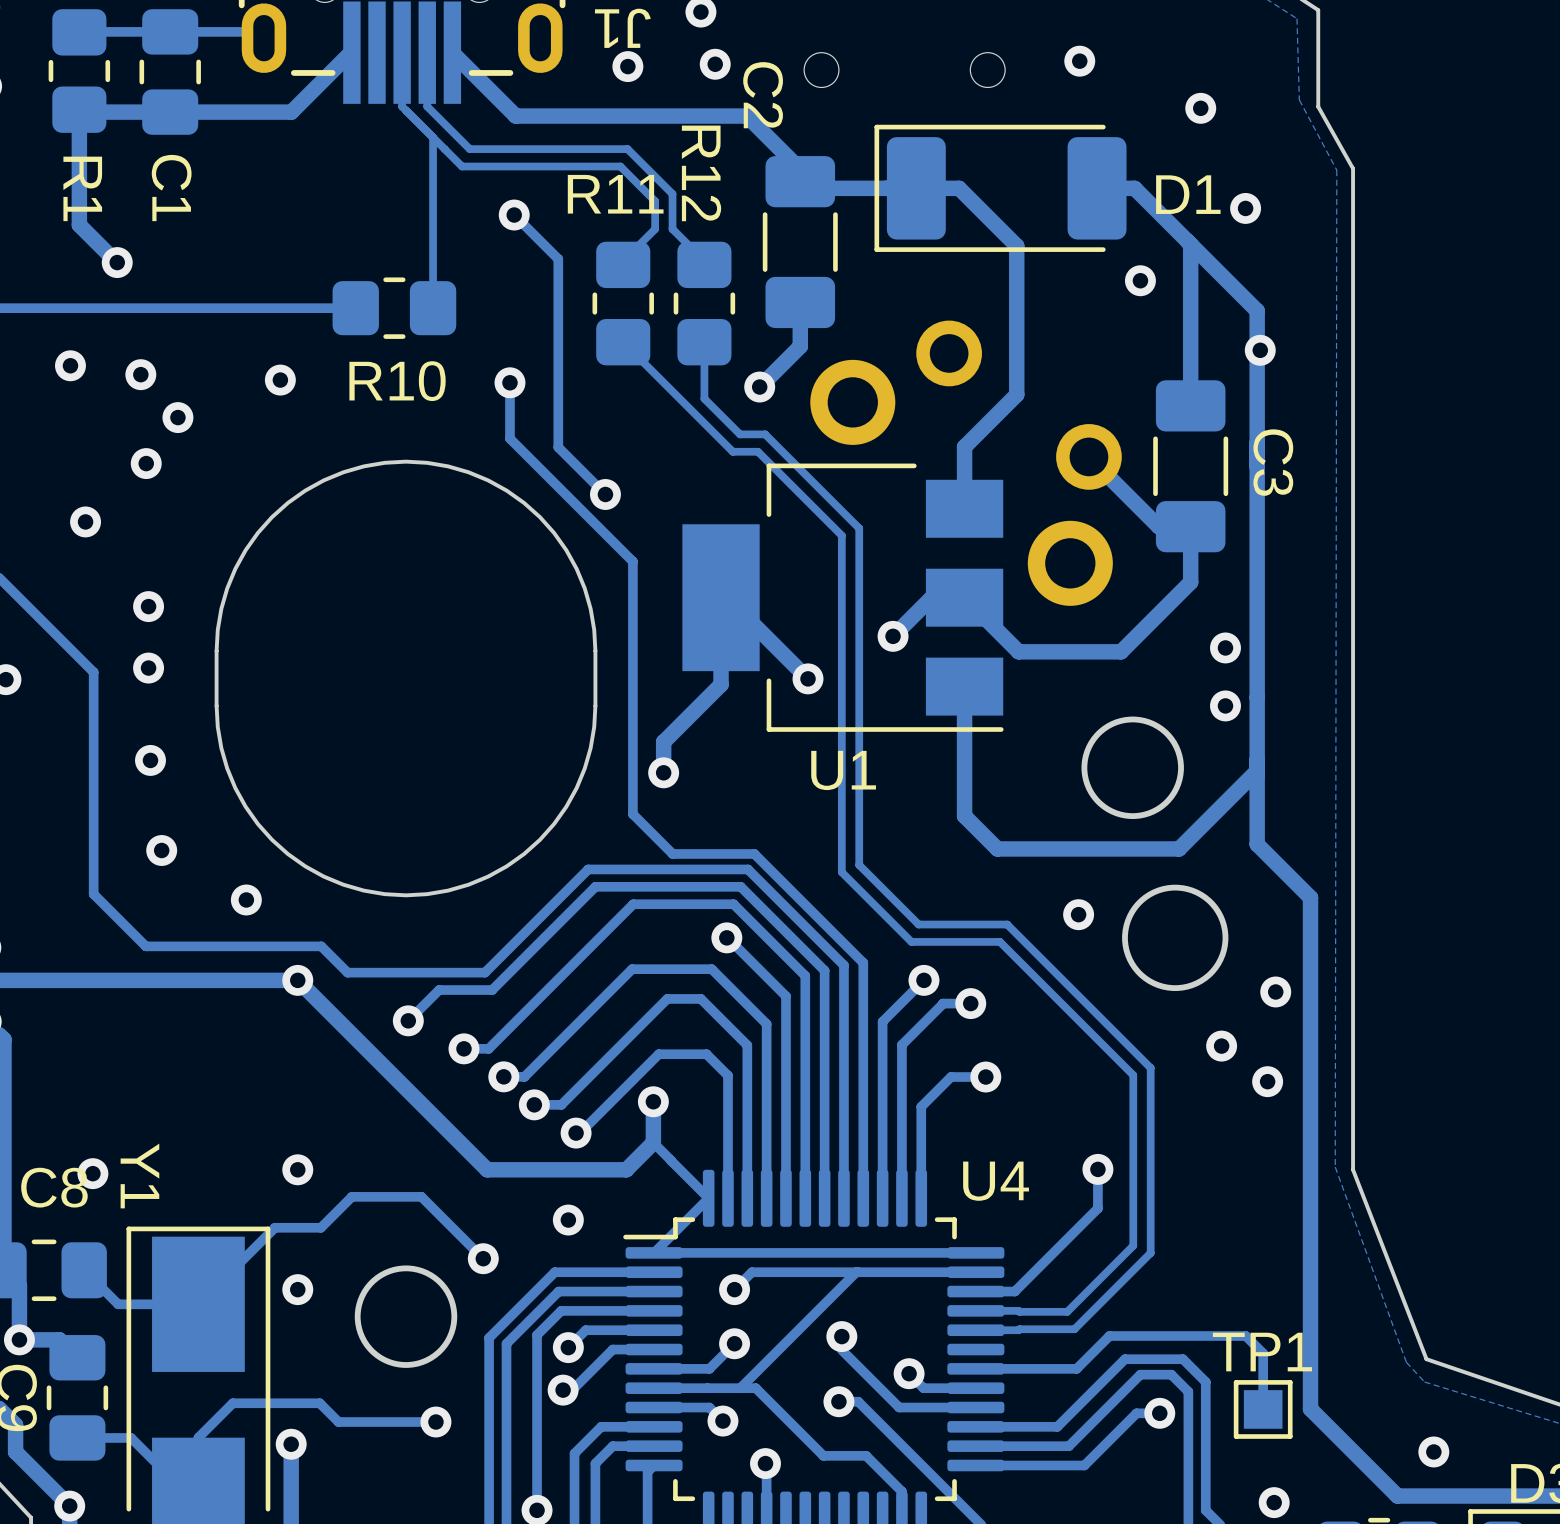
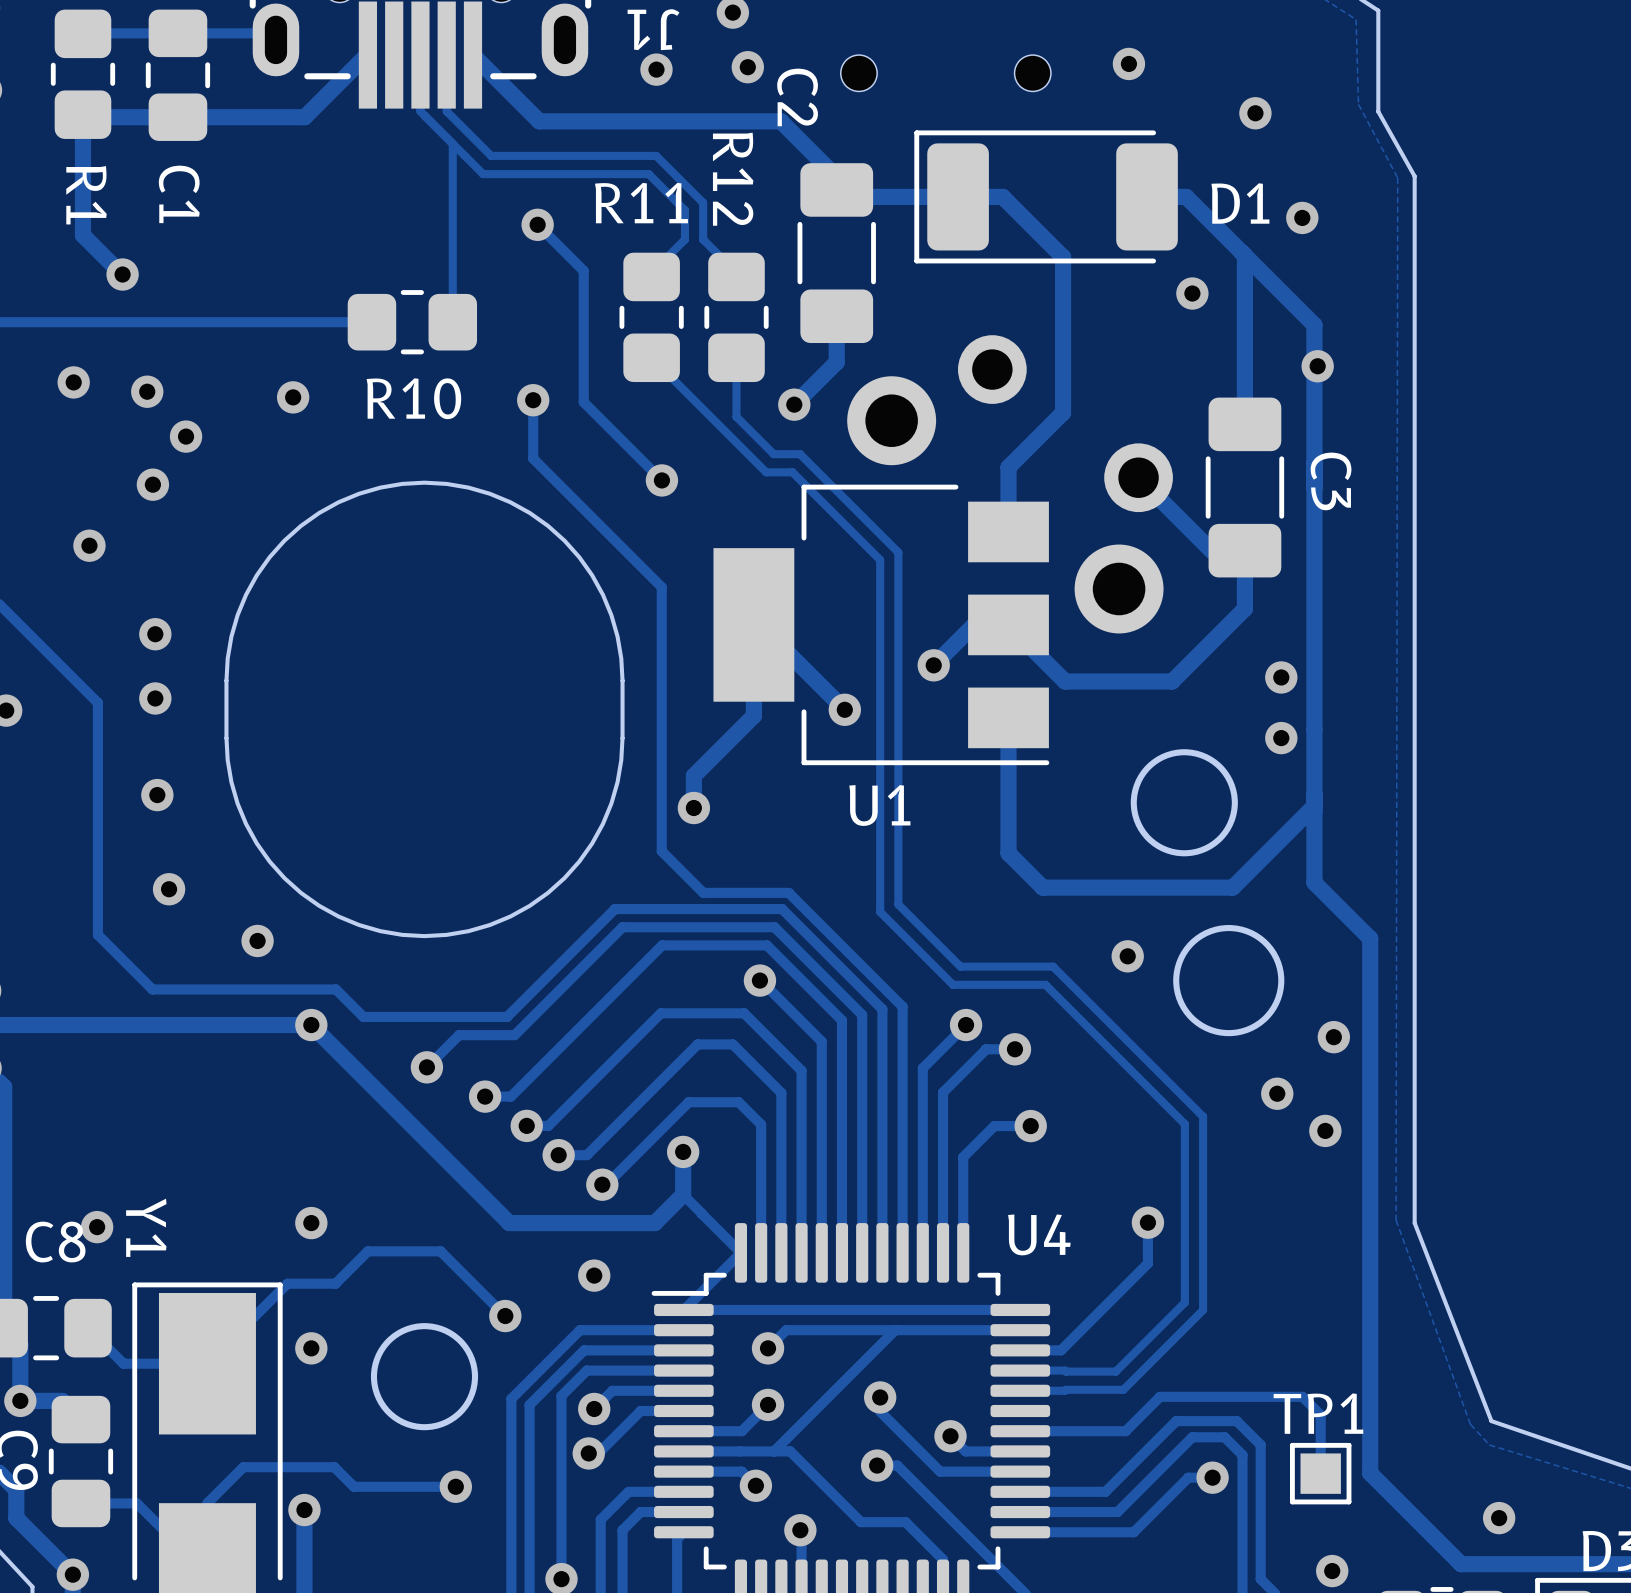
track: (558, 384) (558, 447) (605, 494) -> (583, 402) (661, 480)
via position: (605, 494) -> (661, 480)

